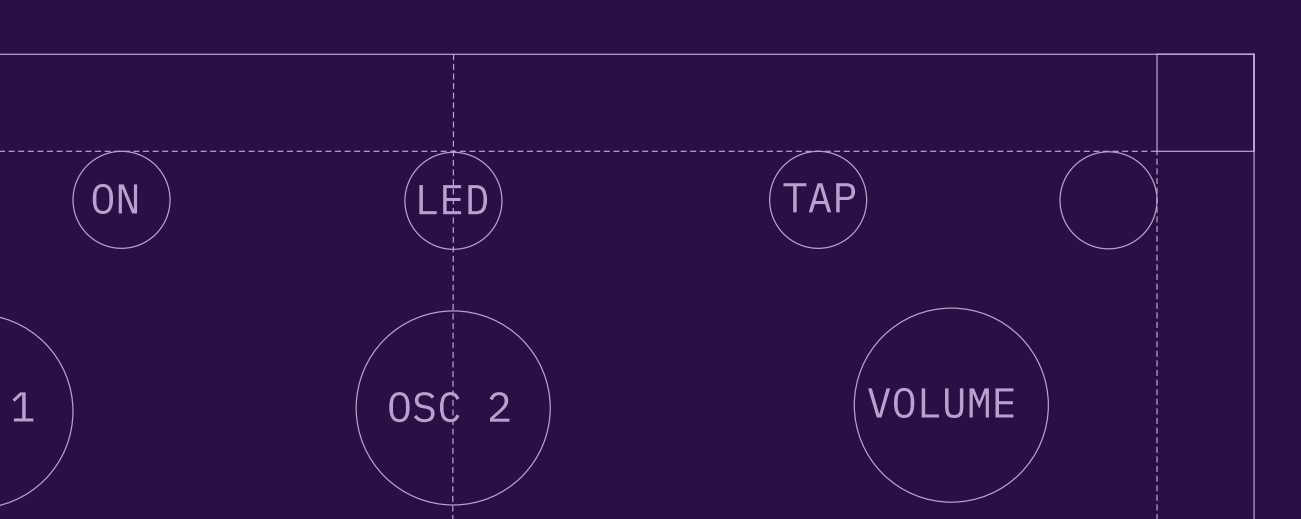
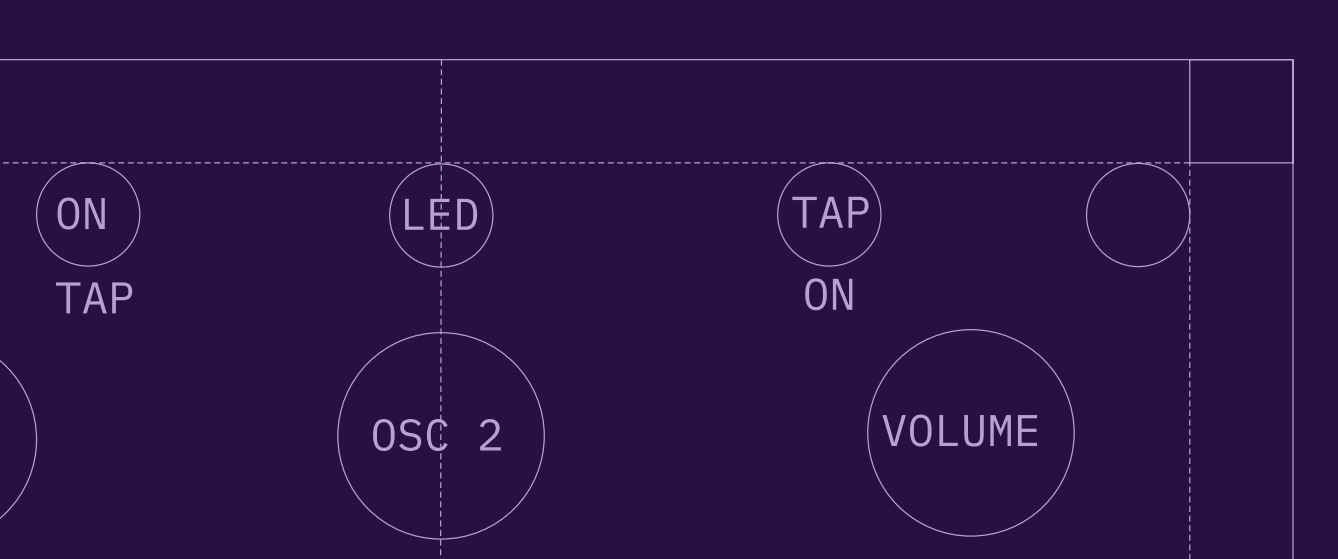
text: none -> ON (828, 294)
text: none -> TAP (94, 297)

